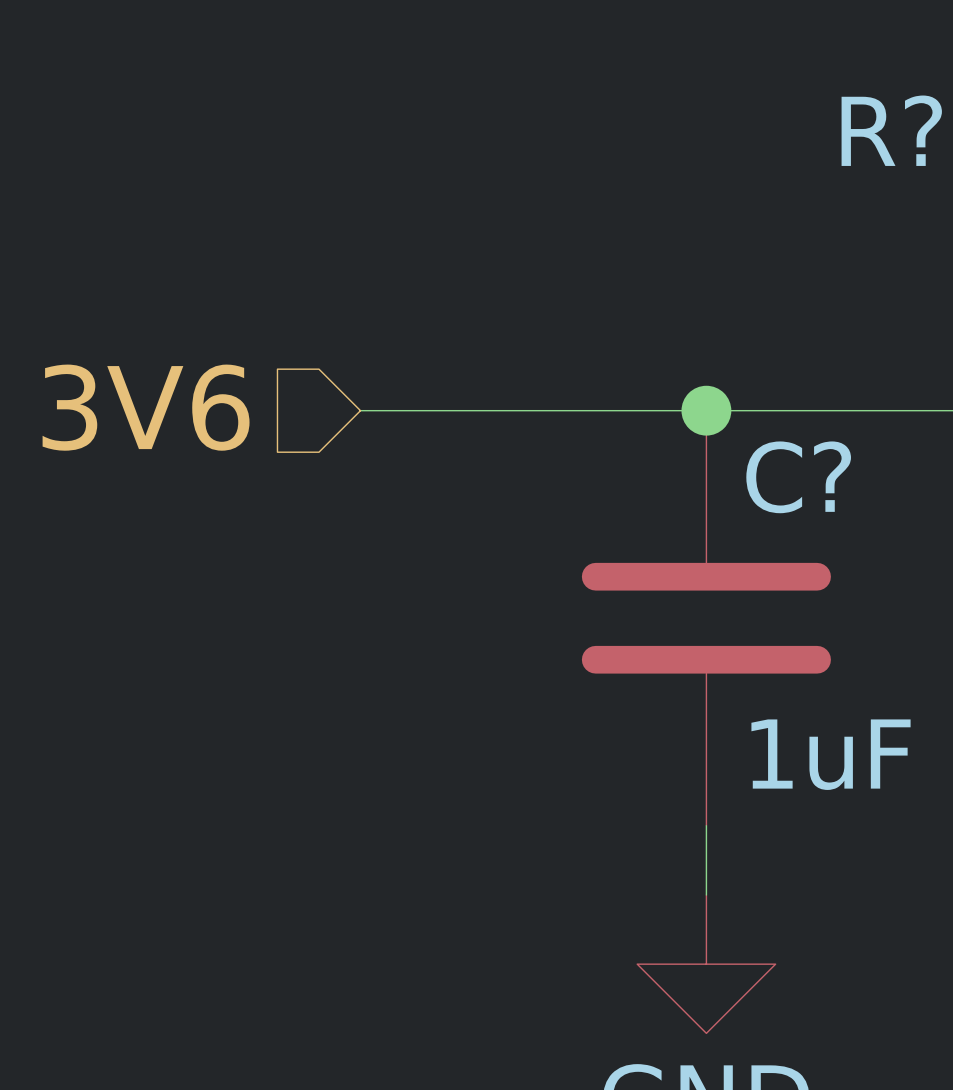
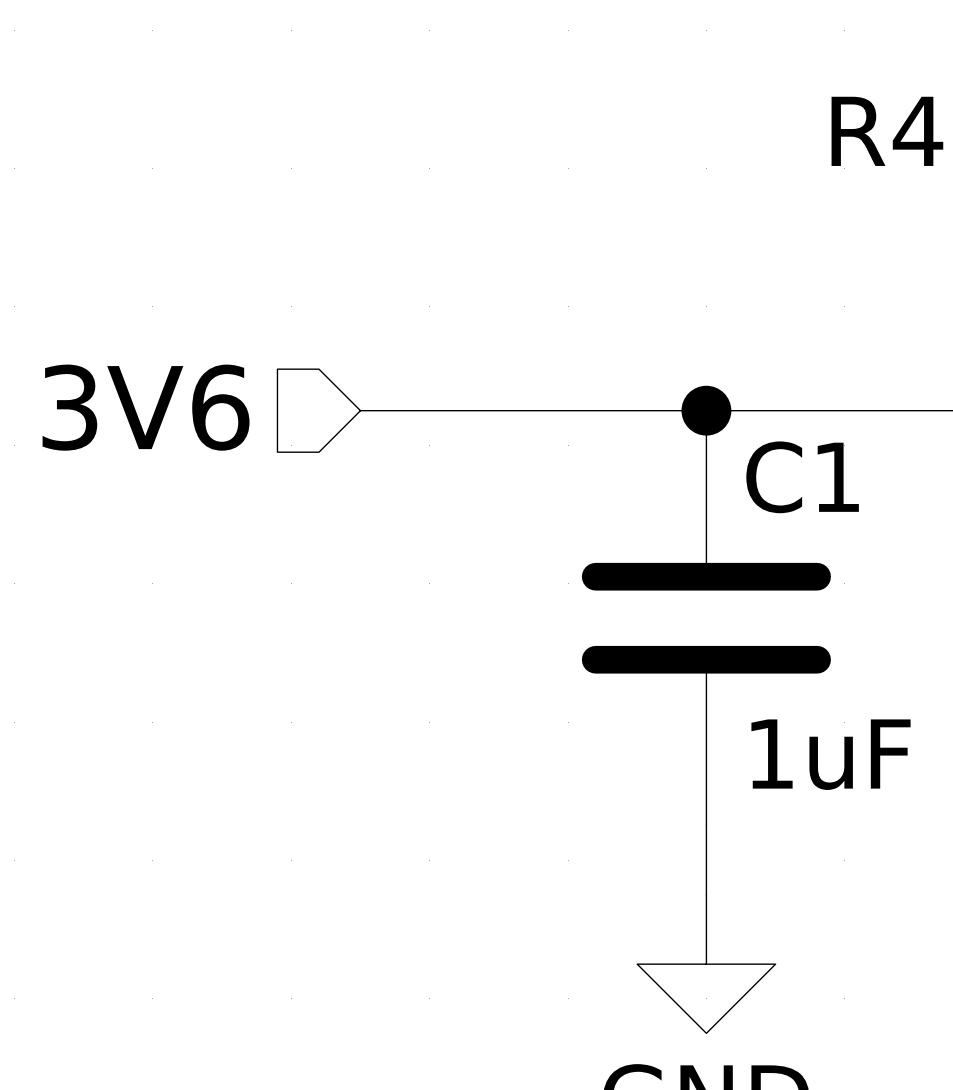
R? name: R? (891, 130) -> R4 (887, 131)
C? name: C? (798, 477) -> C1 (802, 477)

